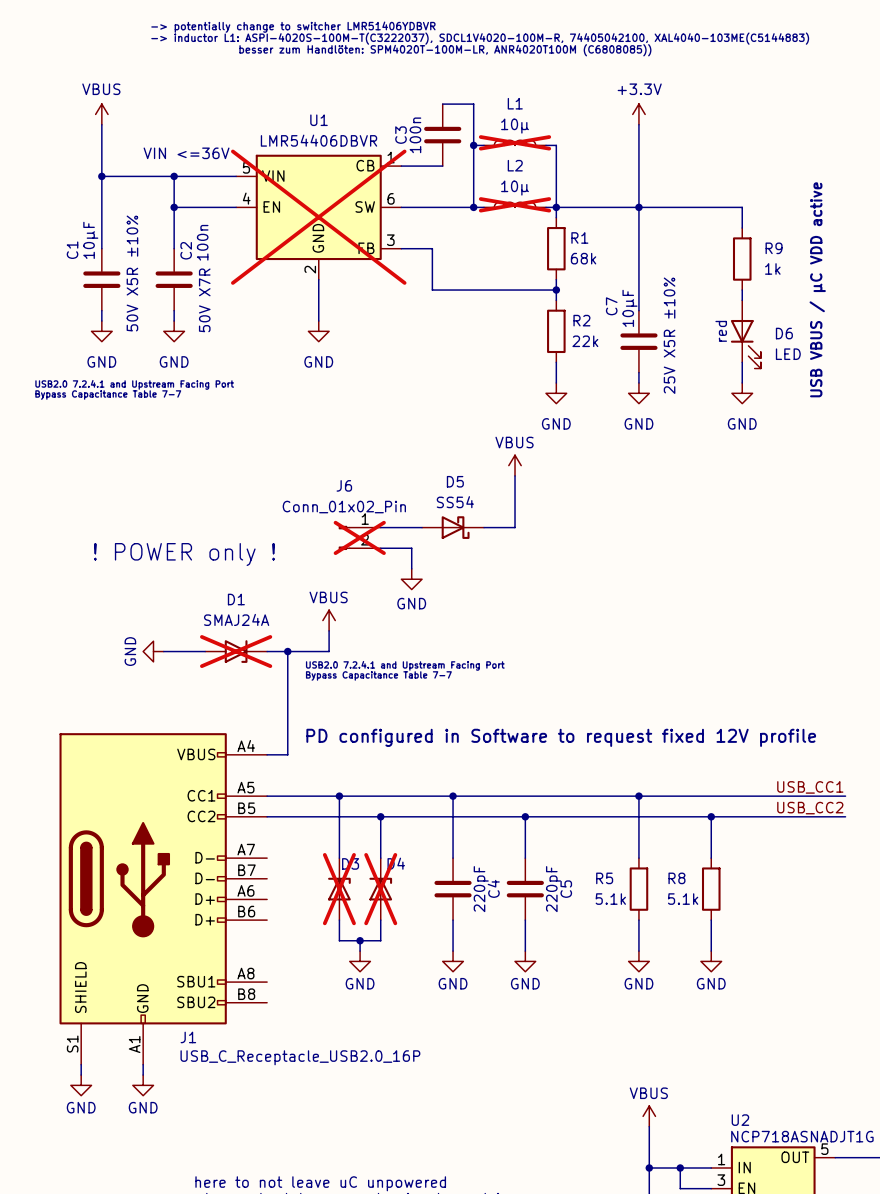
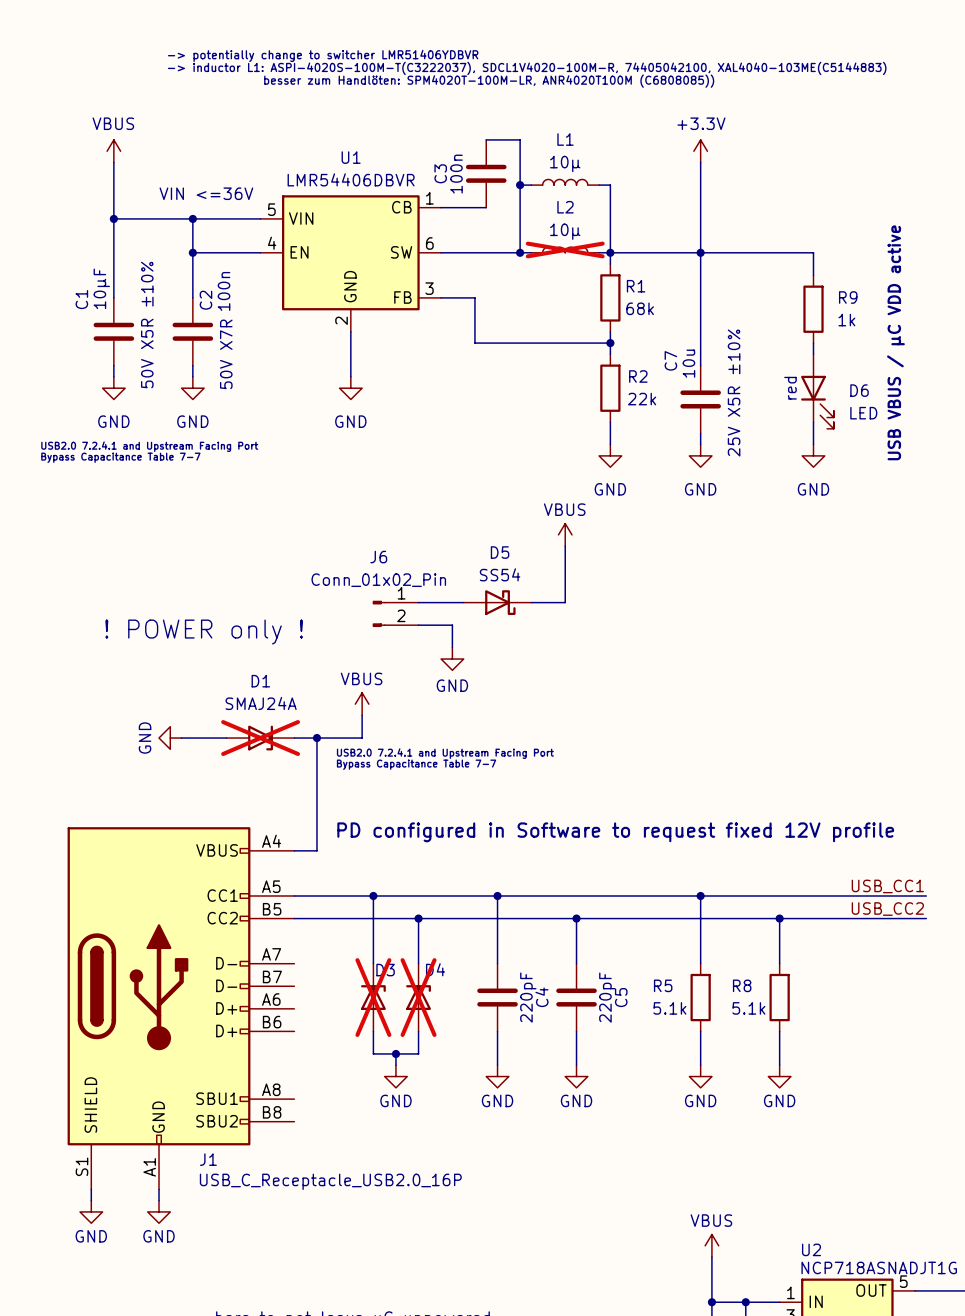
L1 do-not-place cross: (515, 142) -> none
U1 do-not-place cross: (318, 217) -> none
C7 value: 10µF (629, 308) -> 10u (688, 363)
J6 do-not-place cross: (359, 537) -> none

